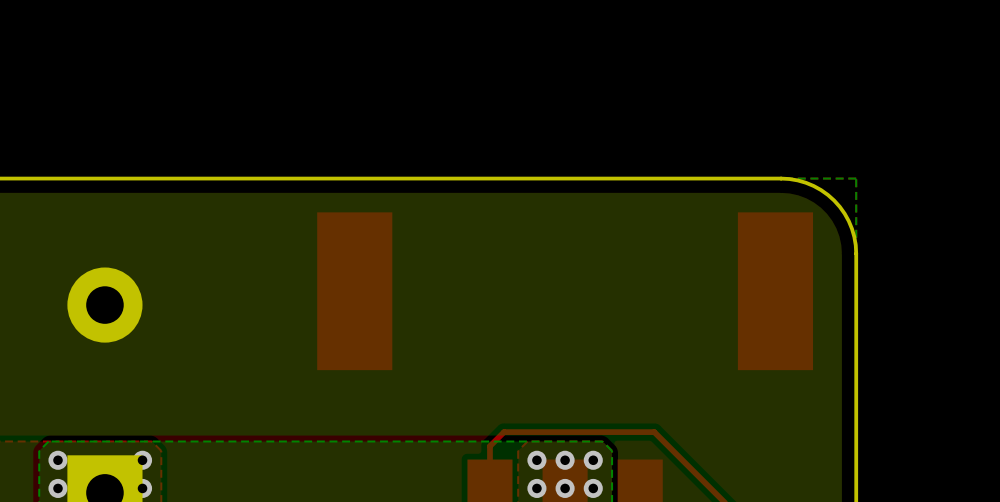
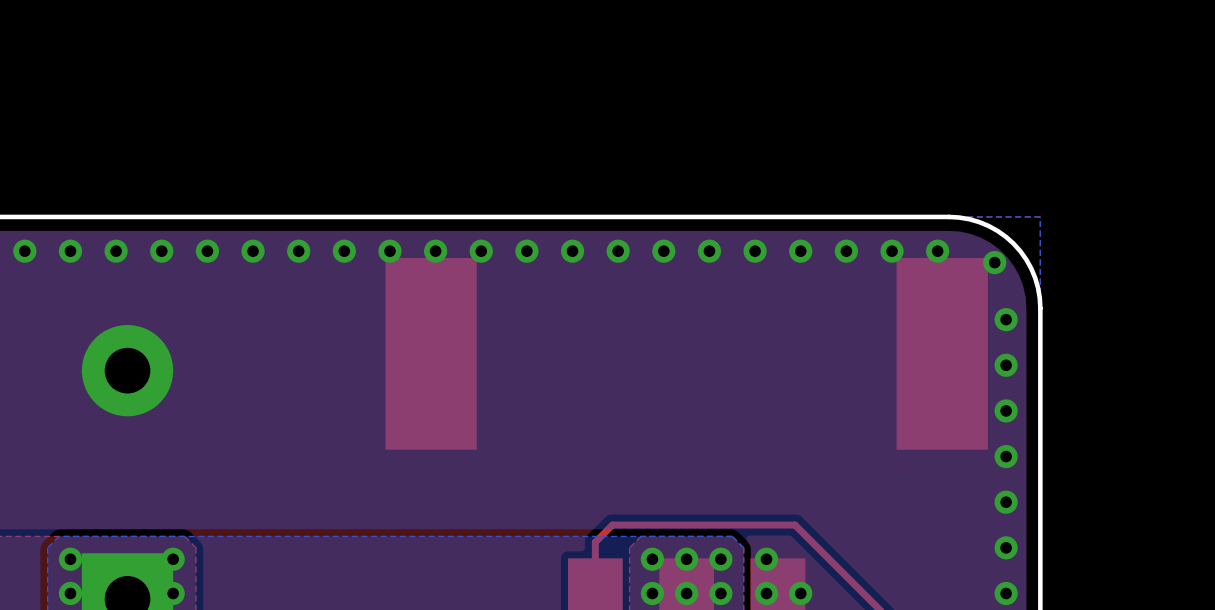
via: none -> (24, 251)
via: none -> (70, 251)
via: none -> (116, 251)
via: none -> (161, 251)
via: none -> (207, 251)
via: none -> (253, 251)
via: none -> (298, 251)
via: none -> (344, 251)
via: none -> (389, 251)
via: none -> (435, 251)
via: none -> (481, 251)
via: none -> (526, 251)
via: none -> (572, 251)
via: none -> (618, 251)
via: none -> (663, 251)
via: none -> (709, 251)
via: none -> (755, 251)
via: none -> (800, 251)
via: none -> (846, 251)
via: none -> (892, 251)
via: none -> (937, 251)
via: none -> (994, 262)
via: none -> (1006, 319)
via: none -> (1006, 365)
via: none -> (1006, 410)
via: none -> (1006, 456)
via: none -> (1006, 502)
via: none -> (1006, 547)
via: none -> (766, 559)
via: none -> (766, 593)
via: none -> (800, 593)
via: none -> (1006, 593)

